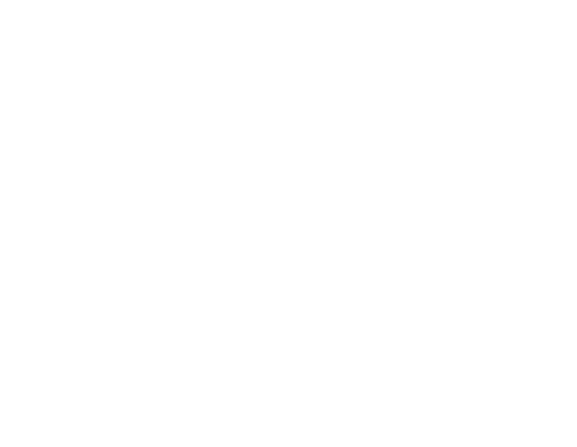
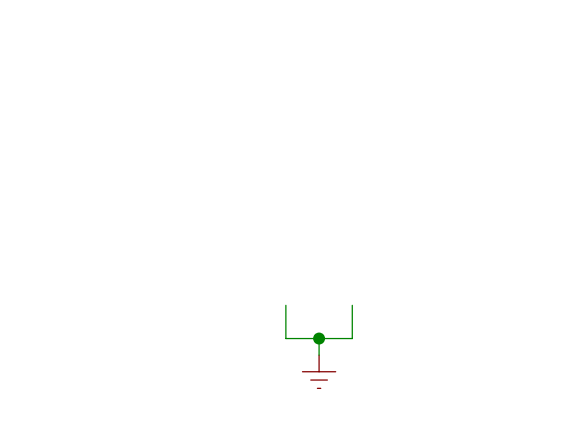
wire: none -> (285, 305) (285, 338) (352, 338) (352, 305)
wire: none -> (319, 338) (319, 355)
junction: none -> (319, 338)
power symbol: none -> (319, 371)

